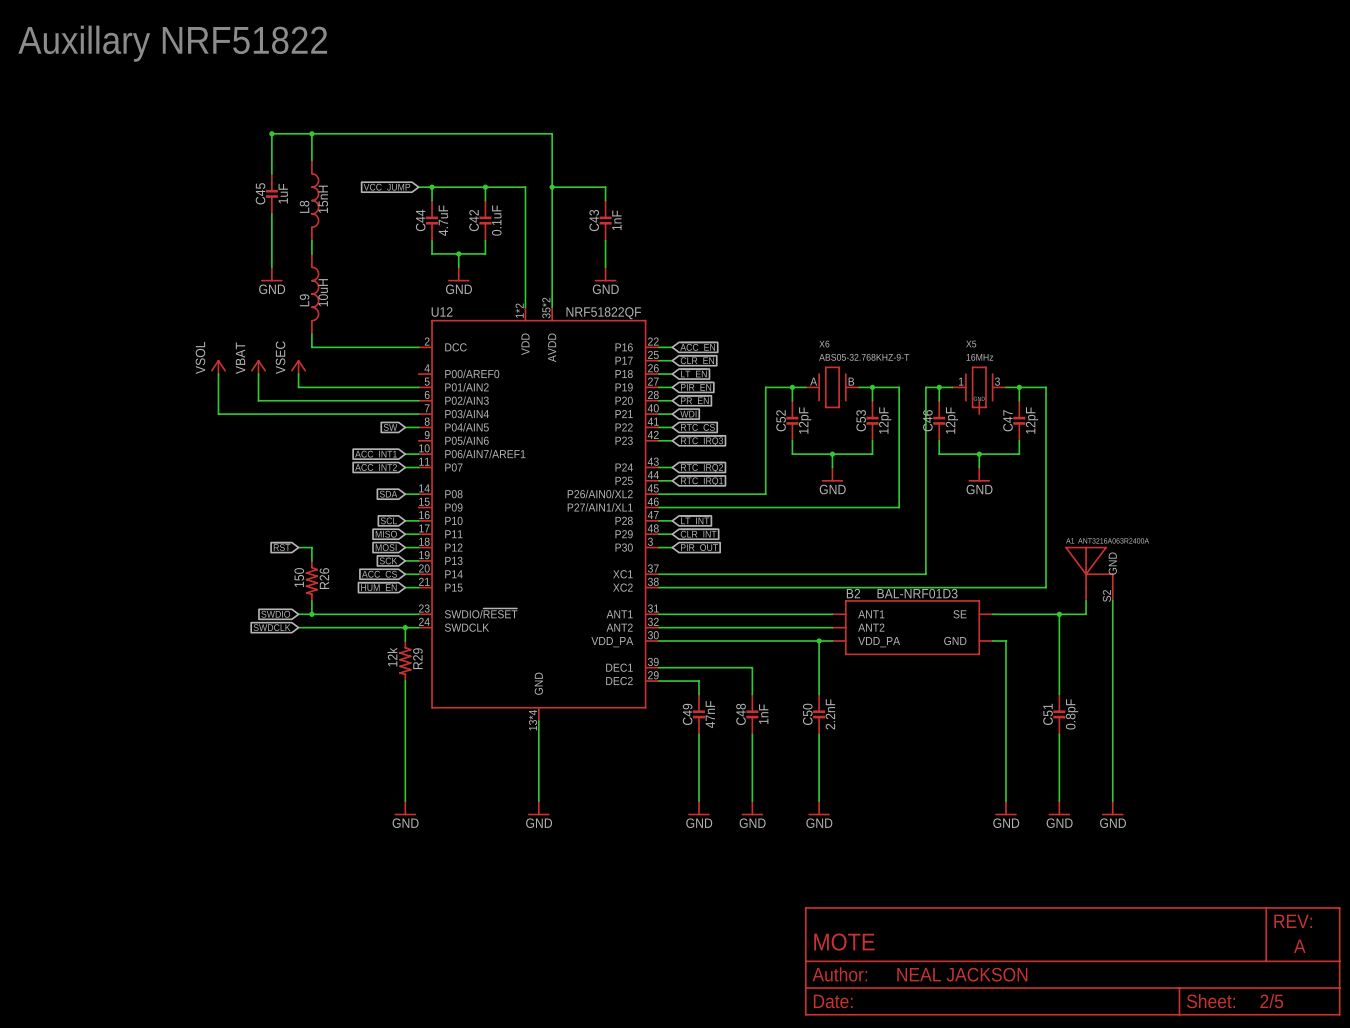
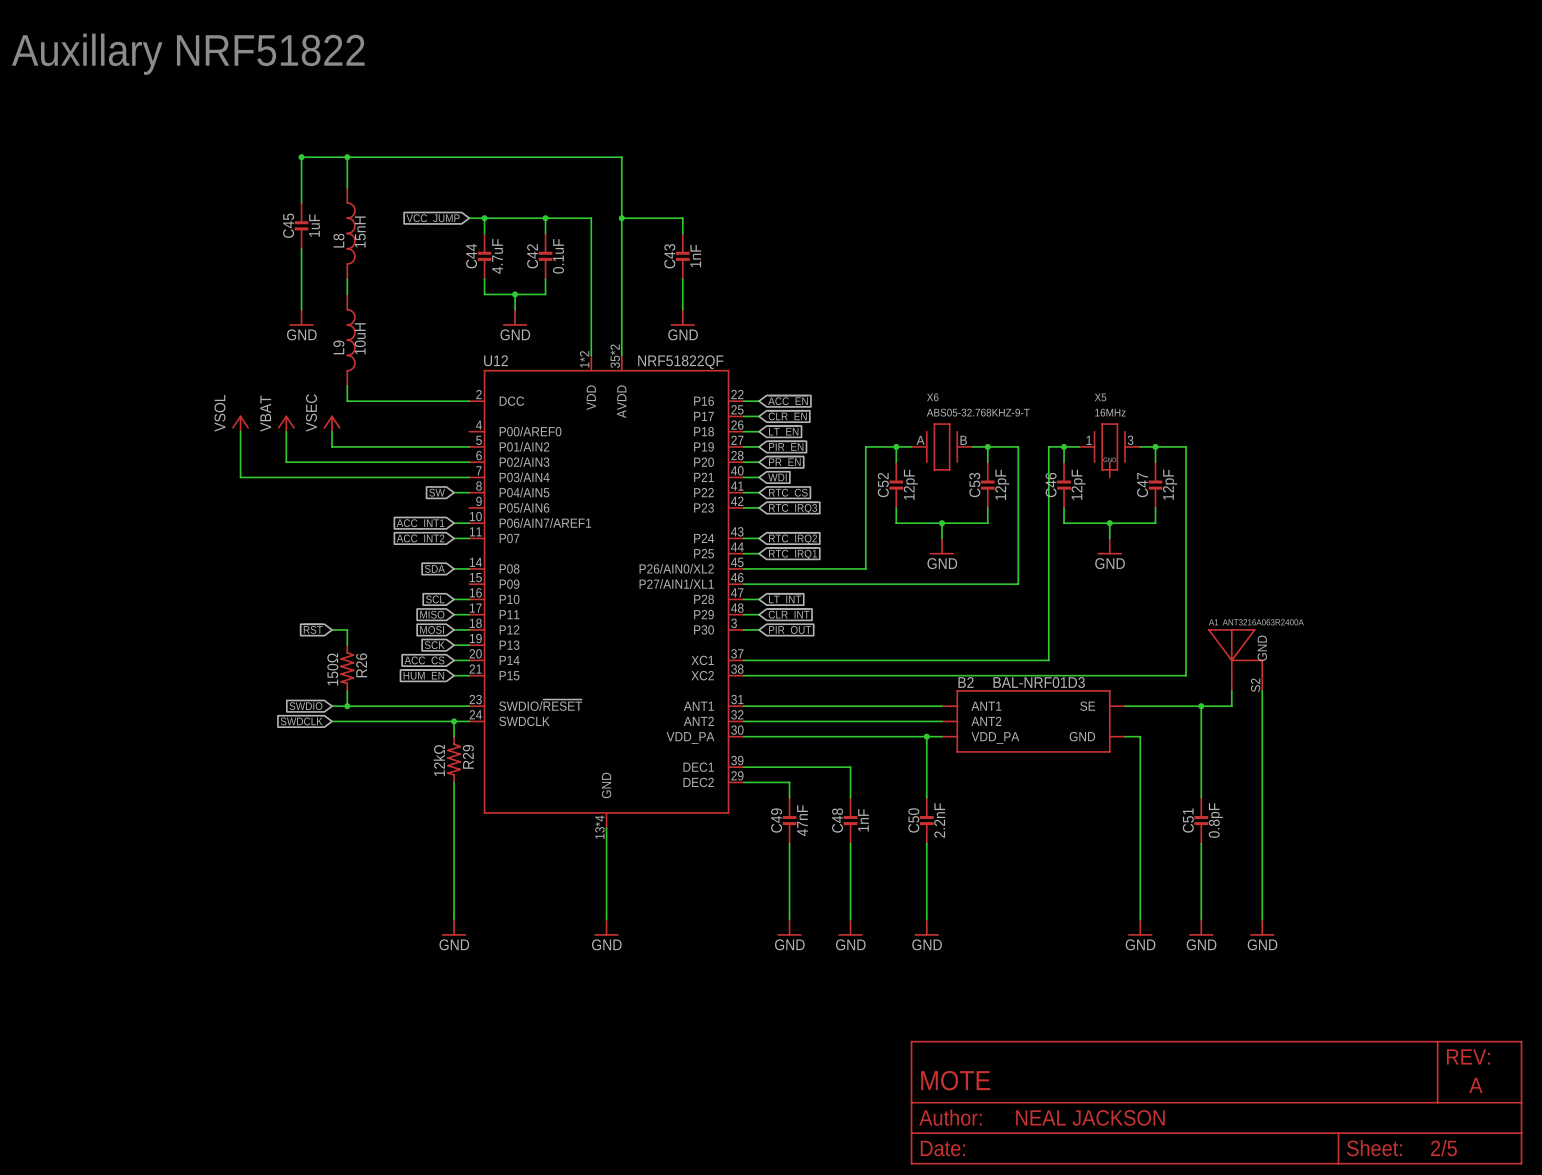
R26 value: 150 (299, 577) -> 150Ω (332, 669)
R29 value: 12k (392, 657) -> 12kΩ (439, 760)

